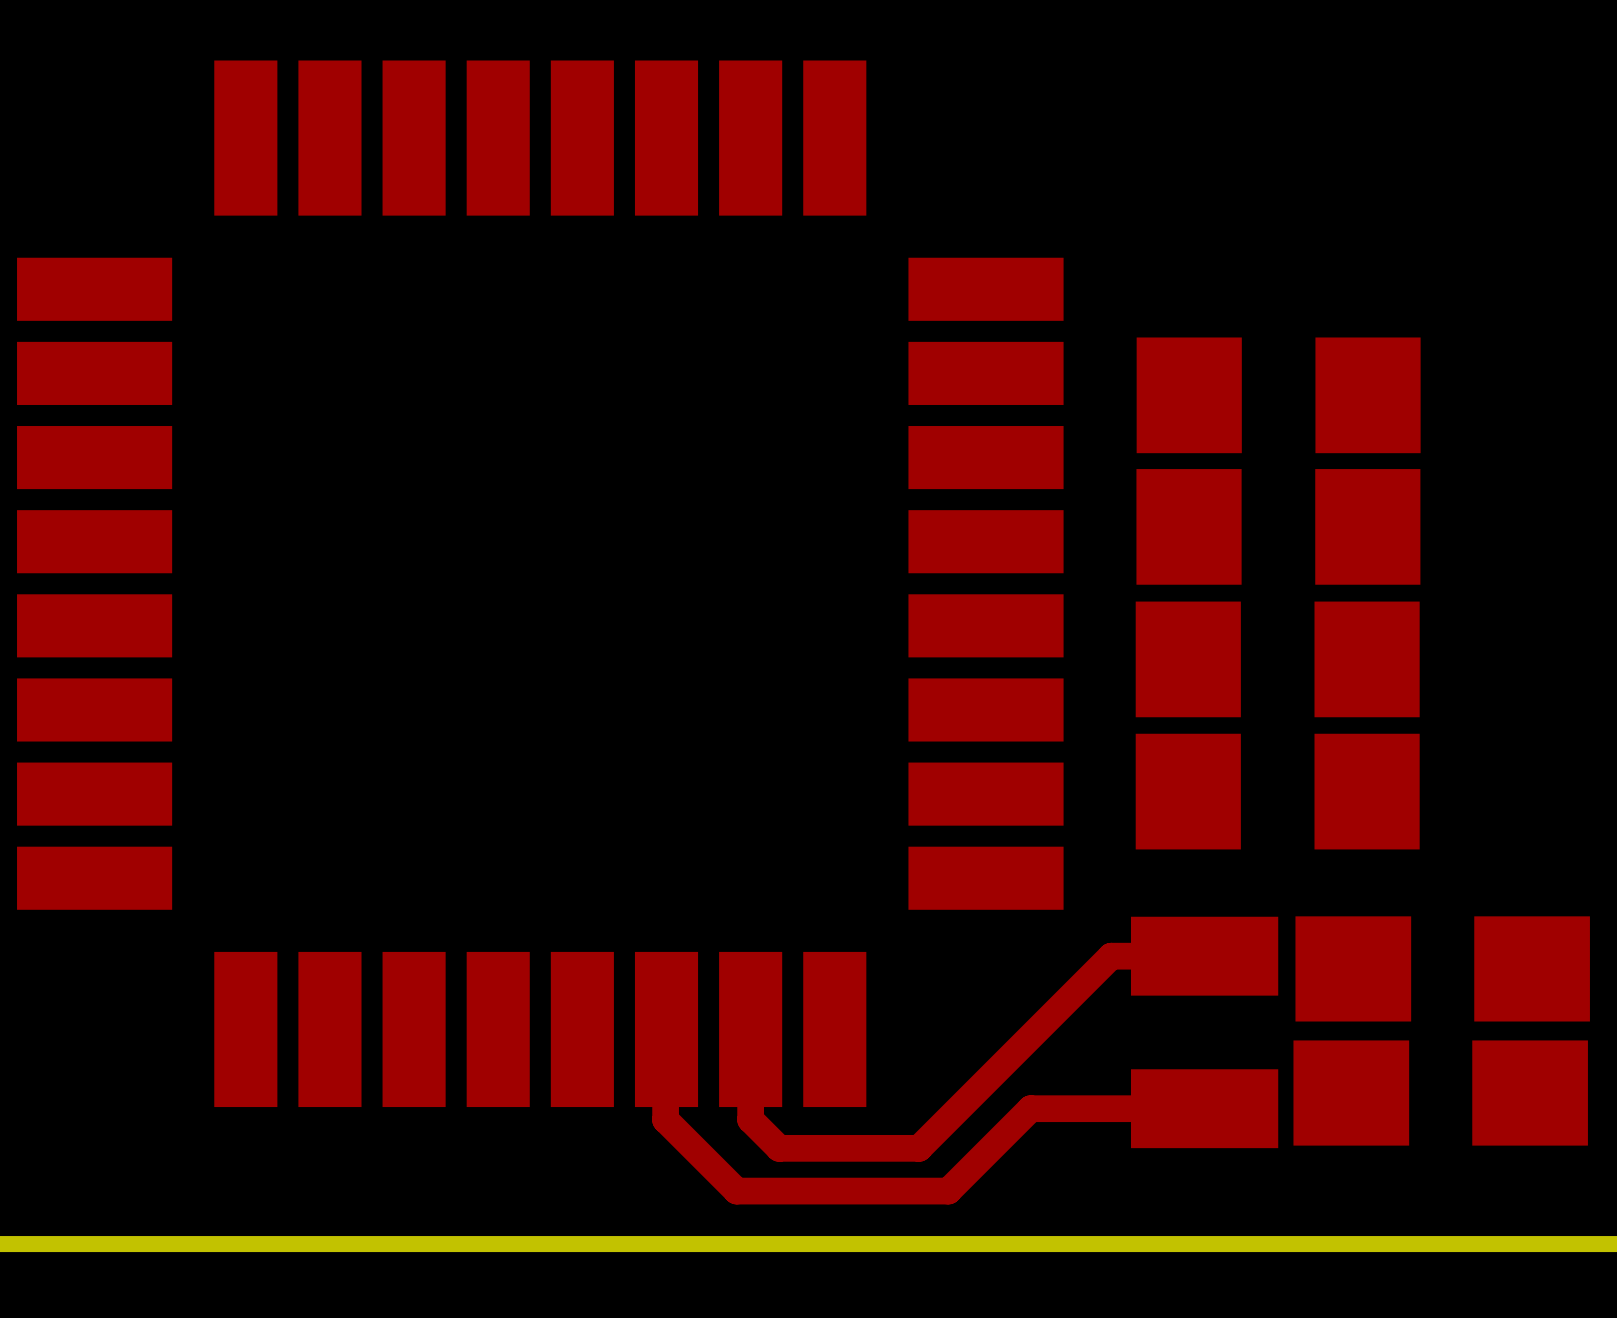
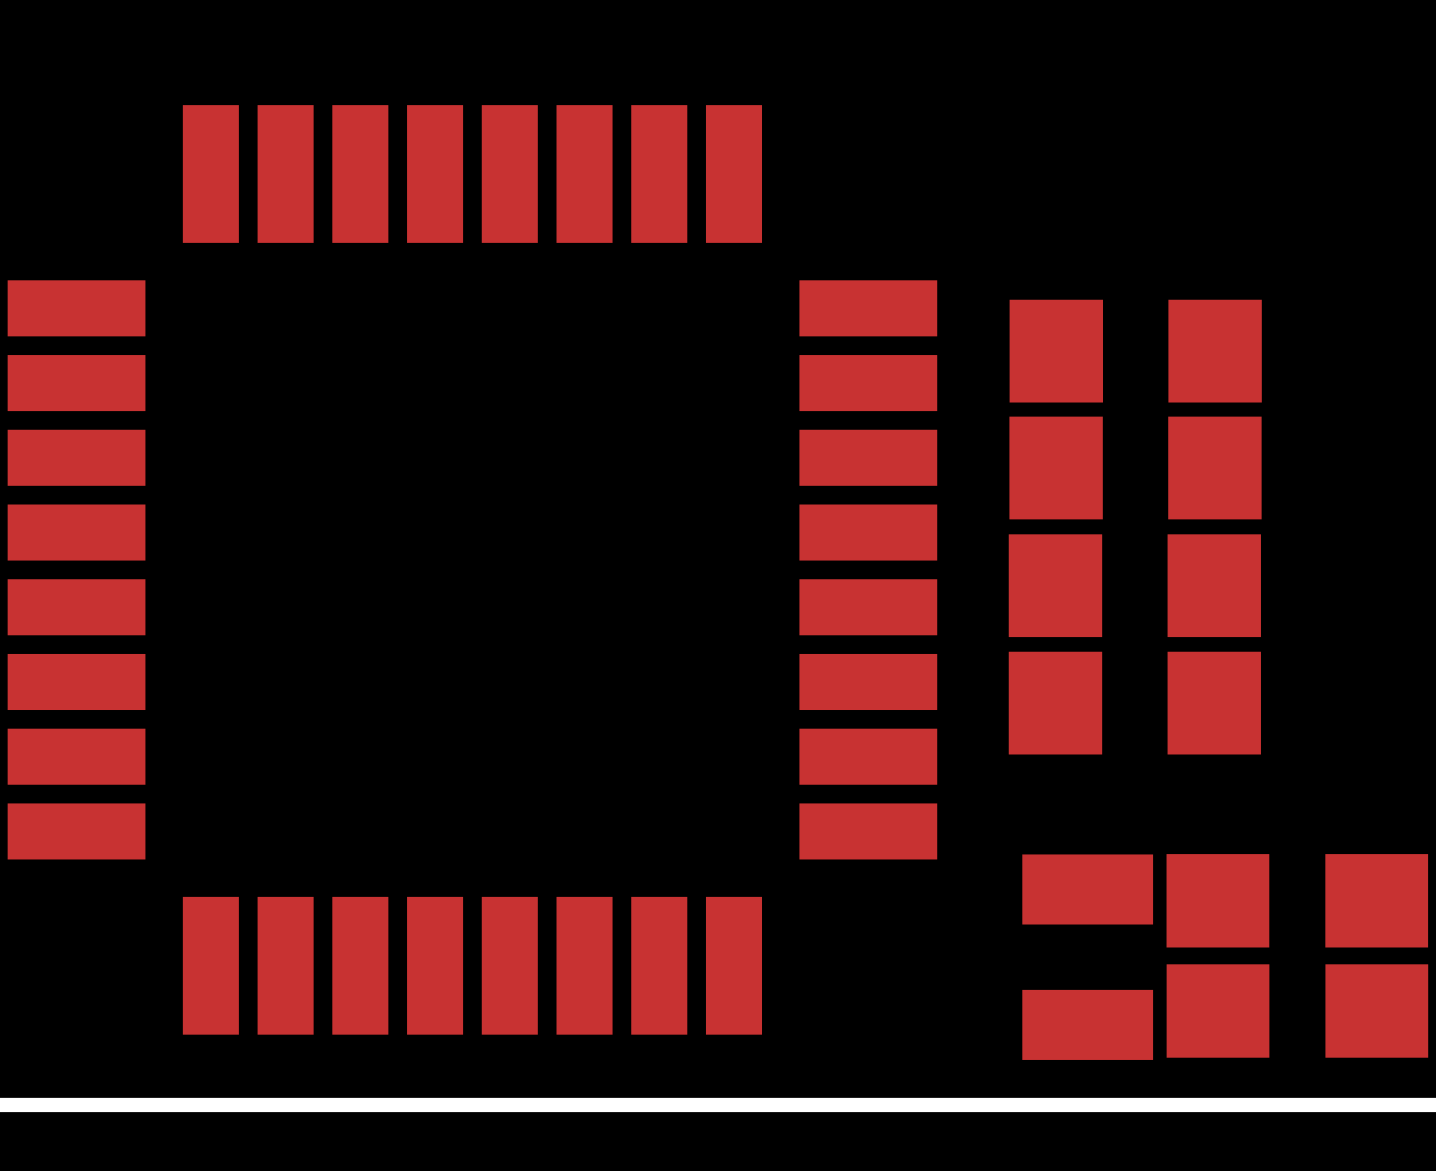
part position: (540, 583) -> (472, 569)
top track: (1204, 956) (1111, 956) (919, 1148) (779, 1148) (750, 1119) (750, 1029) -> none
part: (1442, 968) -> none
part: none -> (1297, 900)
top track: (665, 1030) (665, 1119) (736, 1191) (948, 1191) (1030, 1108) (1204, 1108) -> none
part position: (1204, 1032) -> (1087, 957)
part: (1440, 1093) -> none
part: none -> (1297, 1011)

